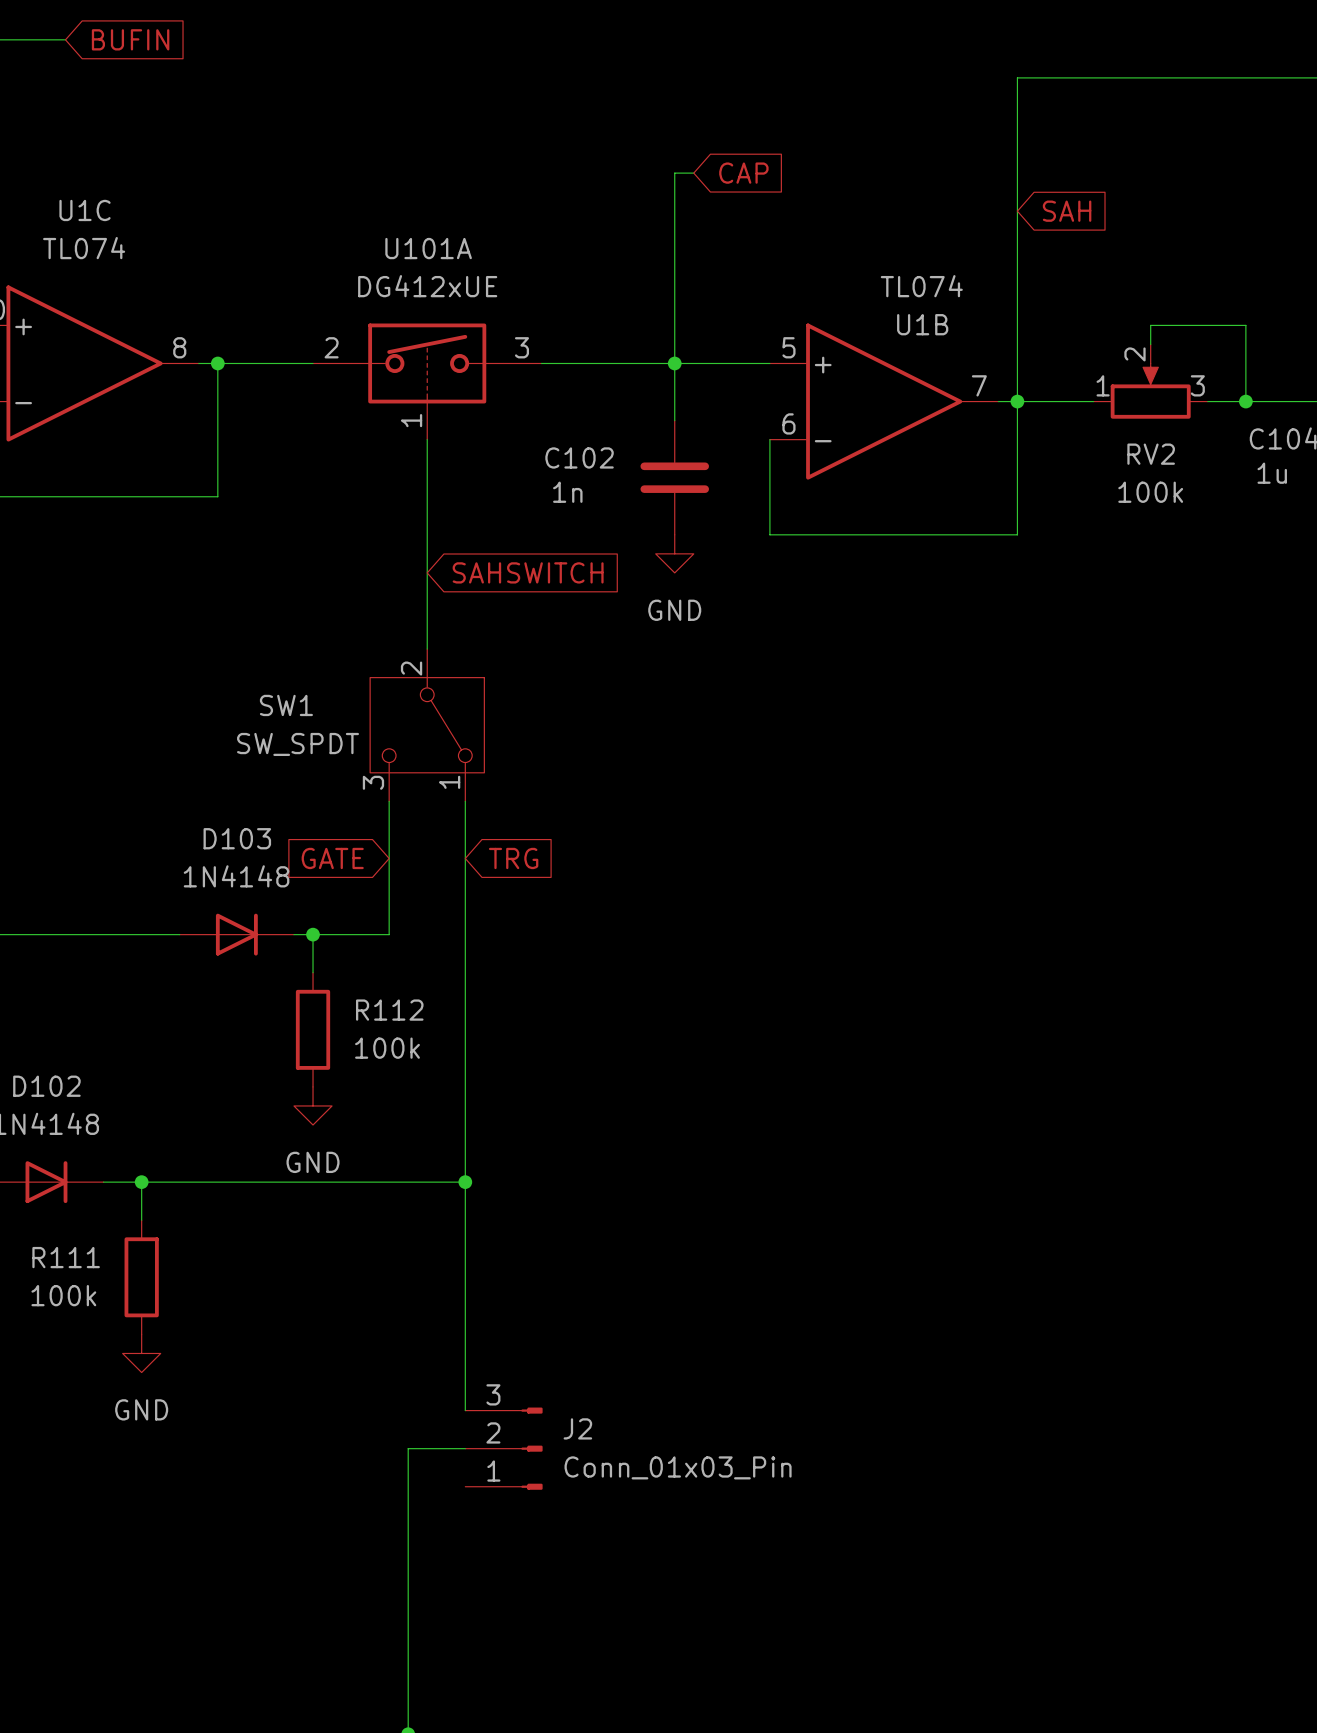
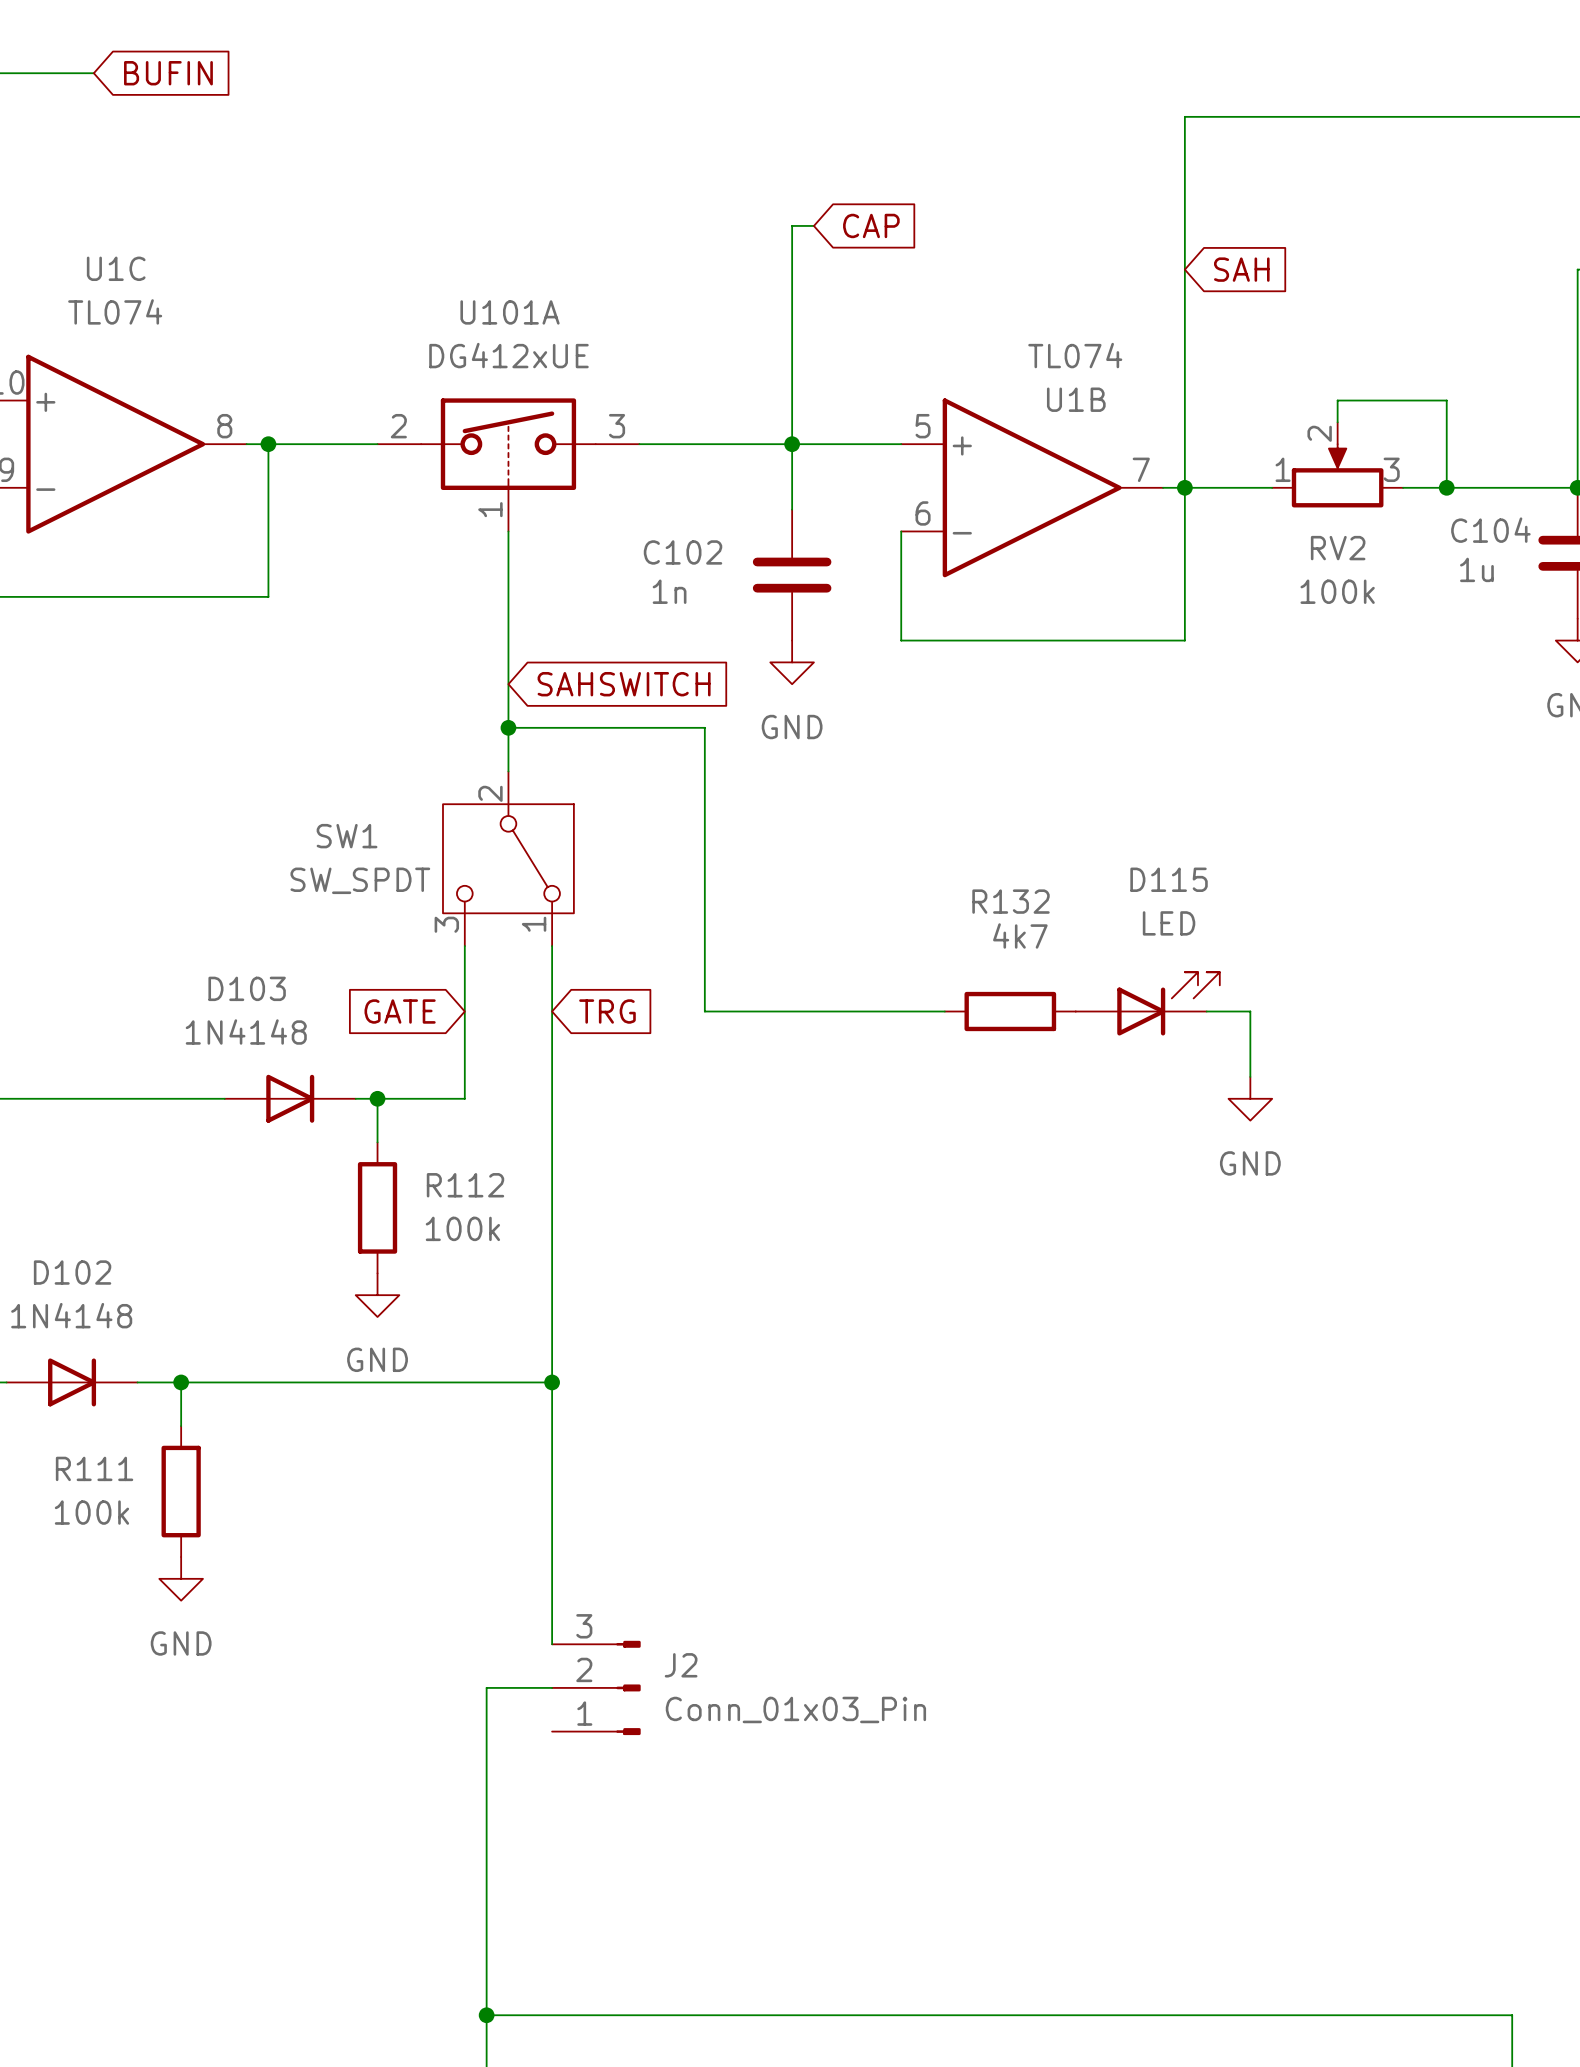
wire: none -> (508, 727) (704, 727) (704, 1011) (944, 1011)
junction: none -> (508, 727)
D103 name position: D103 (237, 838) -> D103 (247, 988)
D115: none -> LED (1147, 1003)
R132: none -> 4k7 (1010, 1011)
wire: none -> (1206, 1011) (1250, 1011) (1250, 1076)
D103 value position: 1N4148 (236, 876) -> 1N4148 (246, 1031)
power symbol: none -> GND (1250, 1098)

